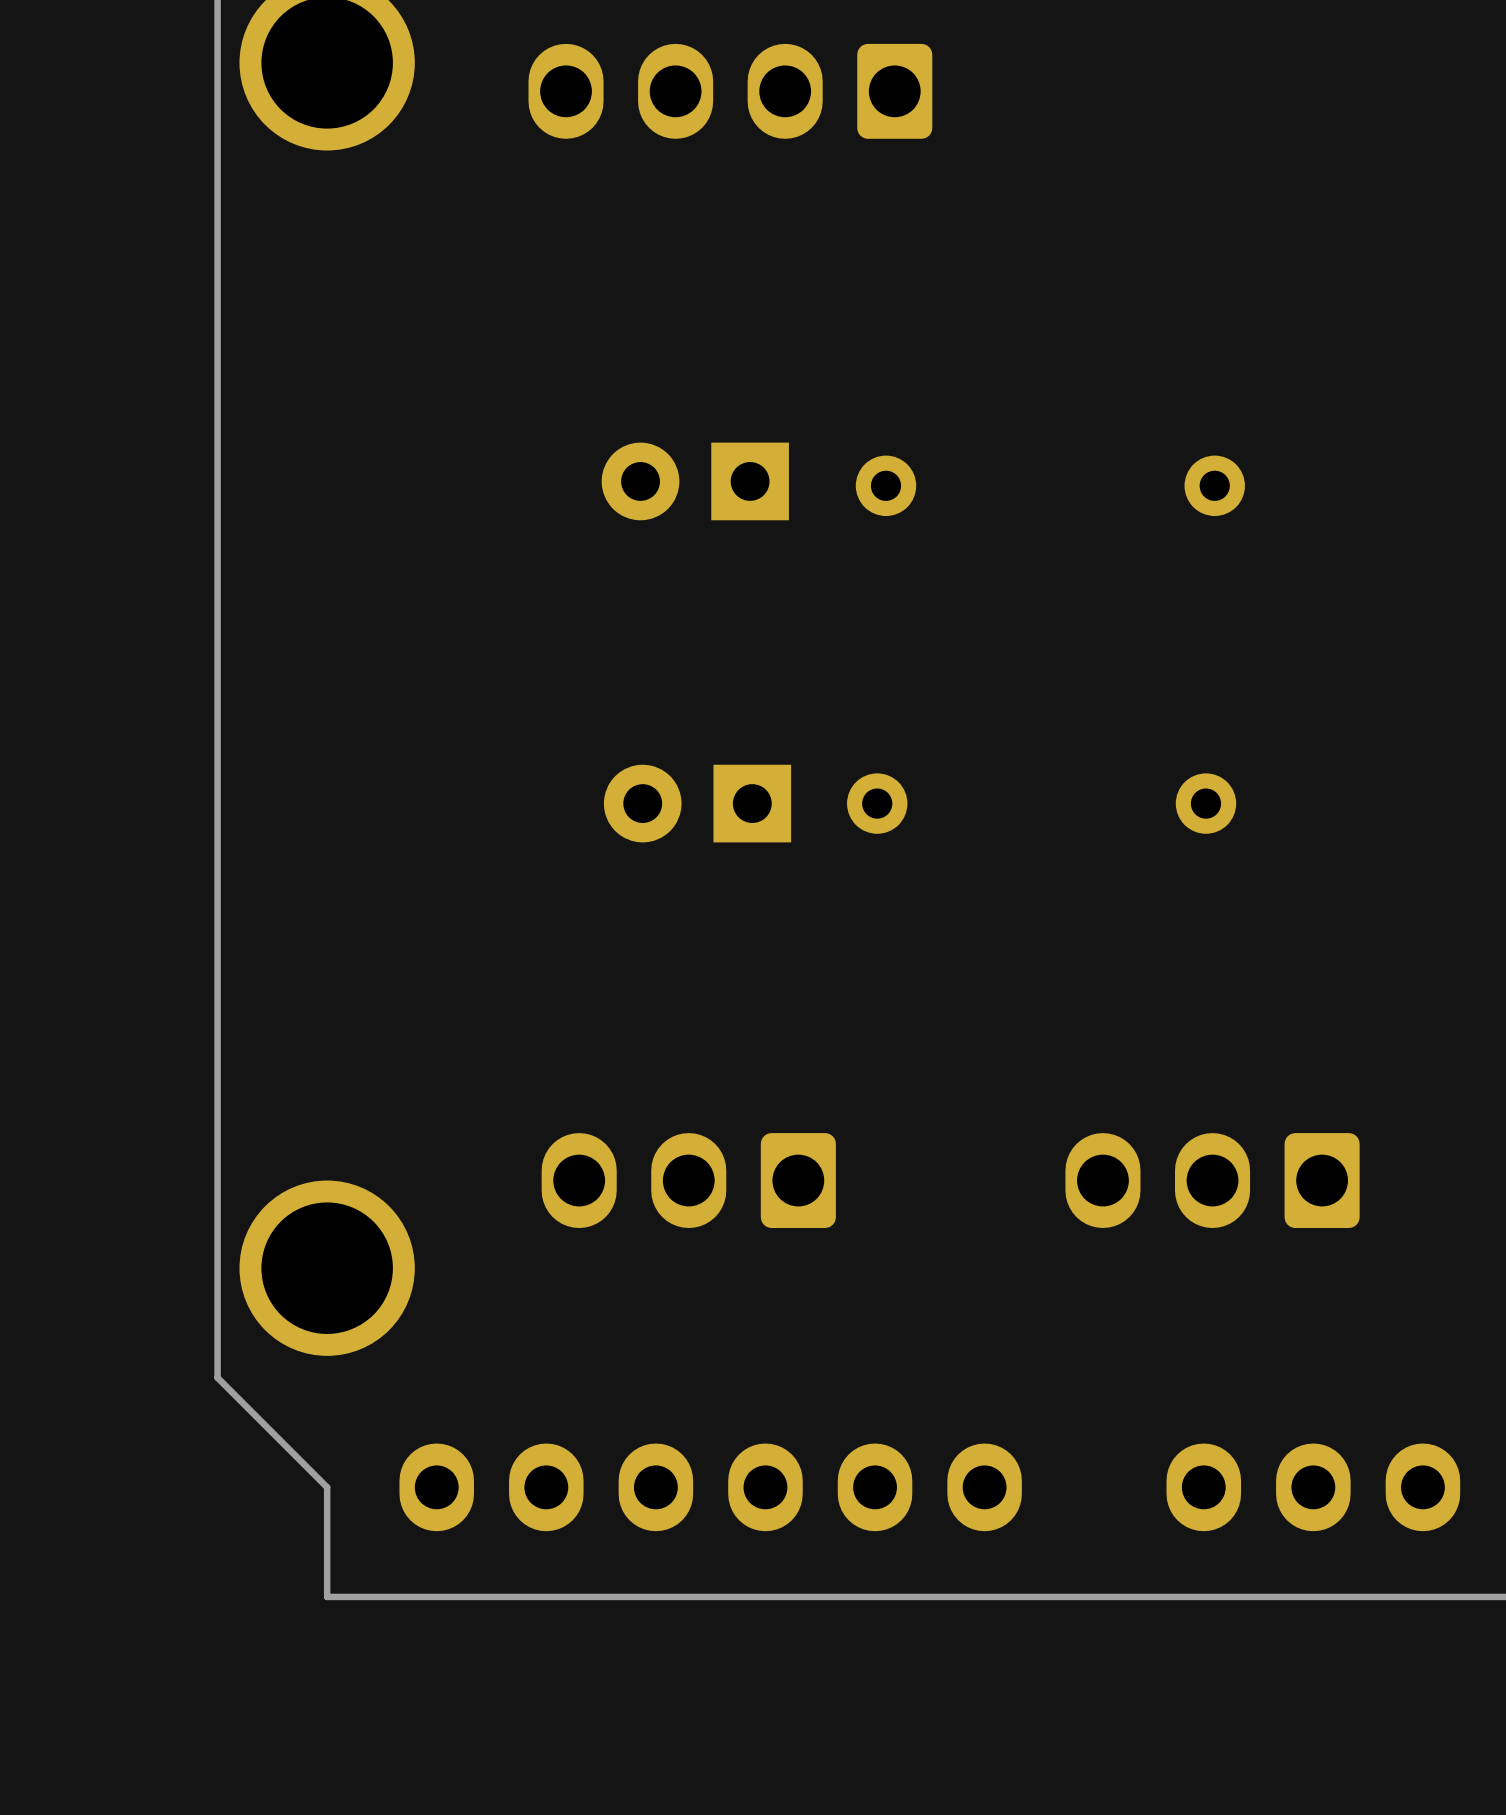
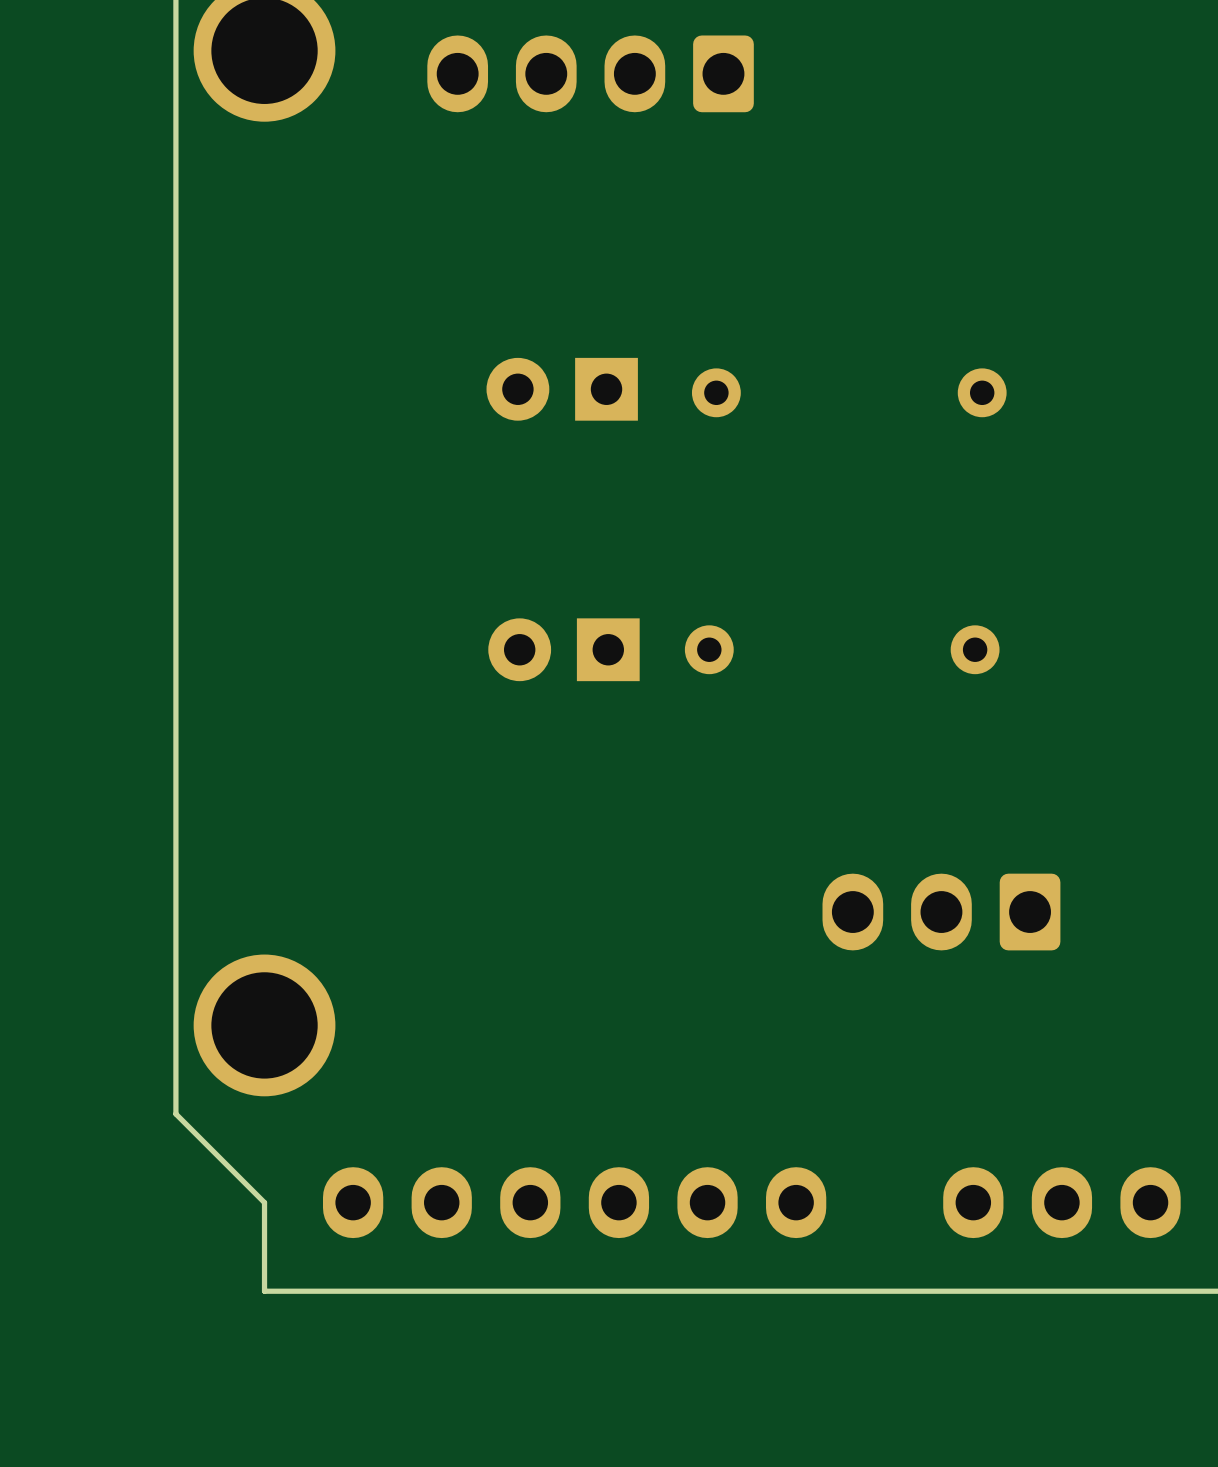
part: (688, 1180) -> none
part position: (1212, 1180) -> (941, 912)

